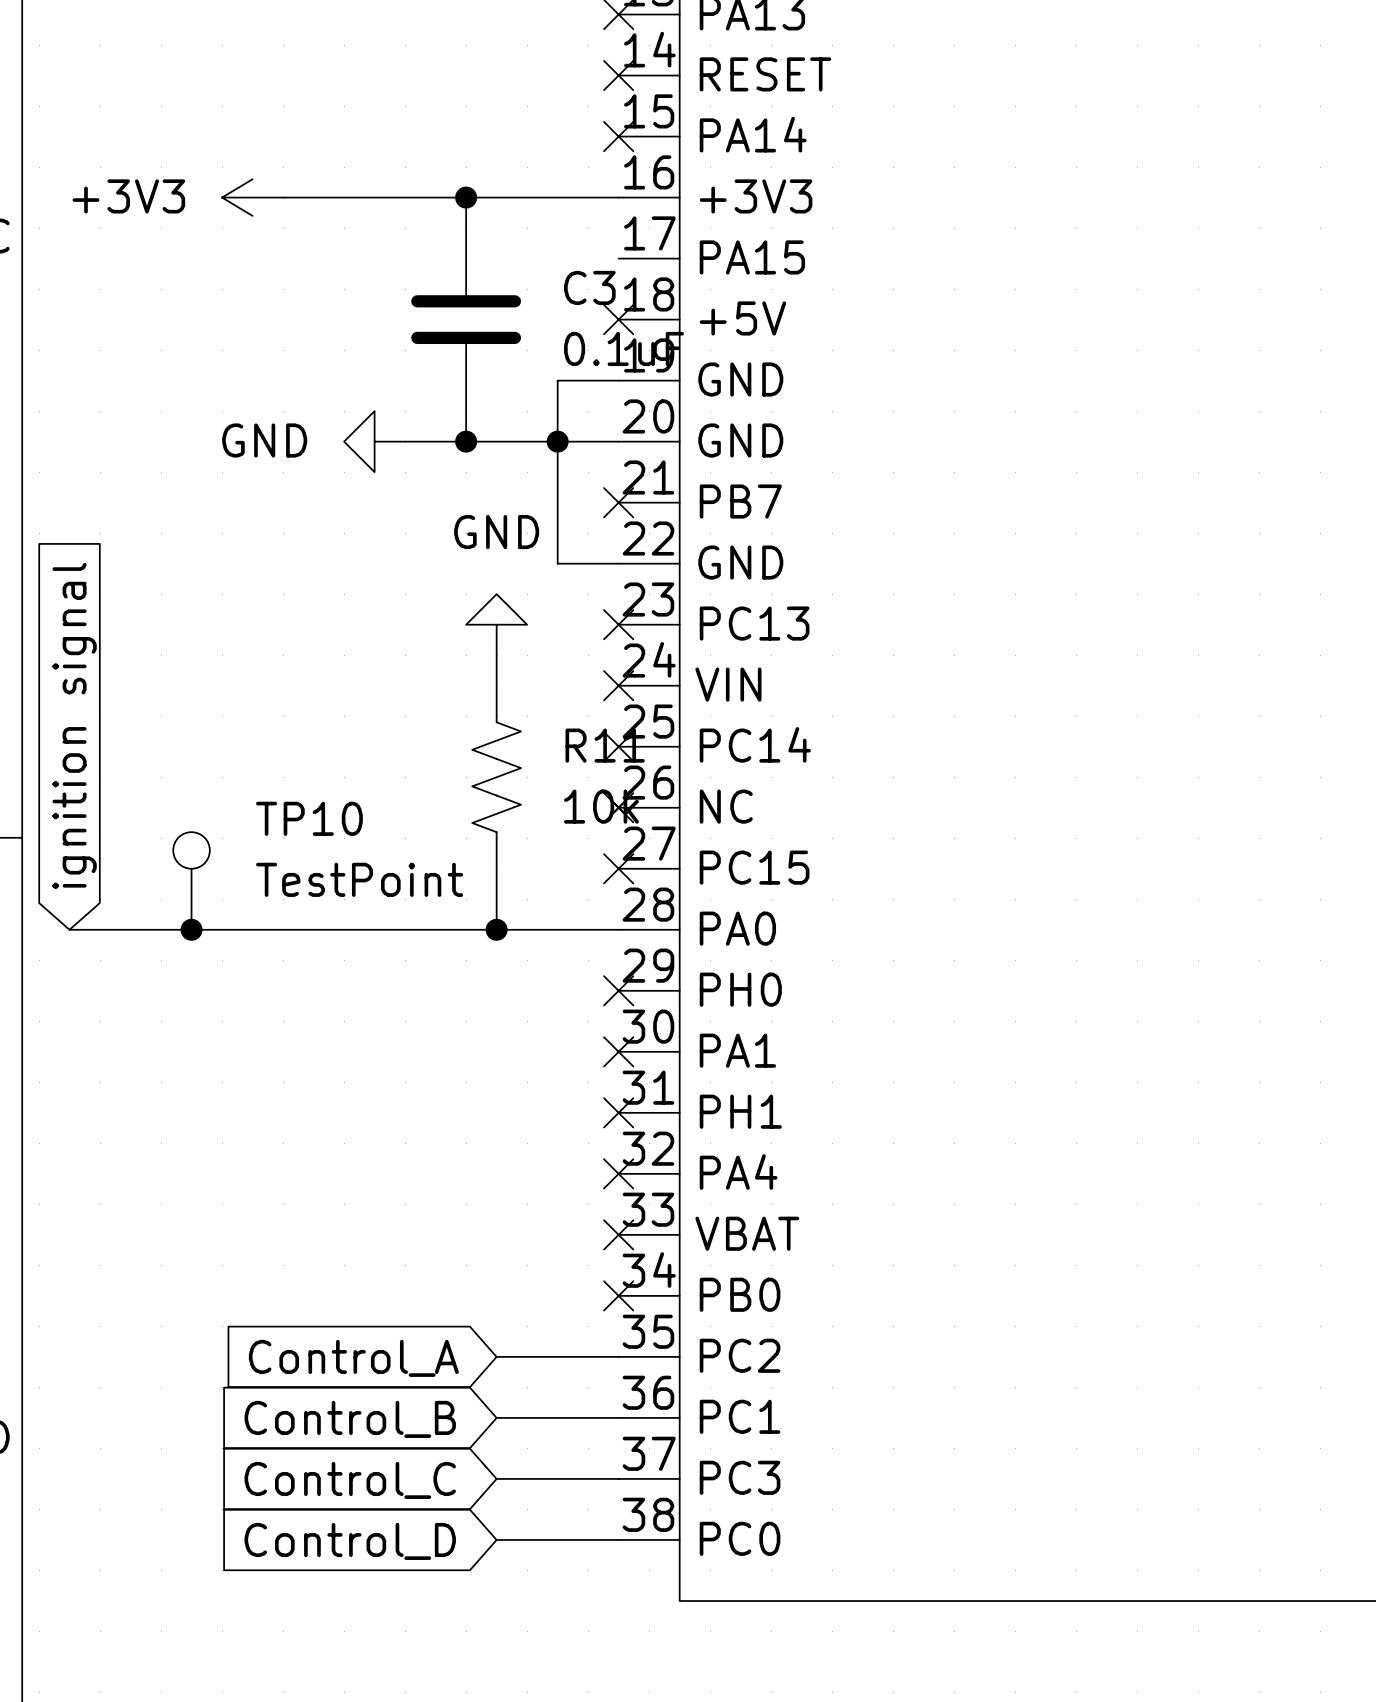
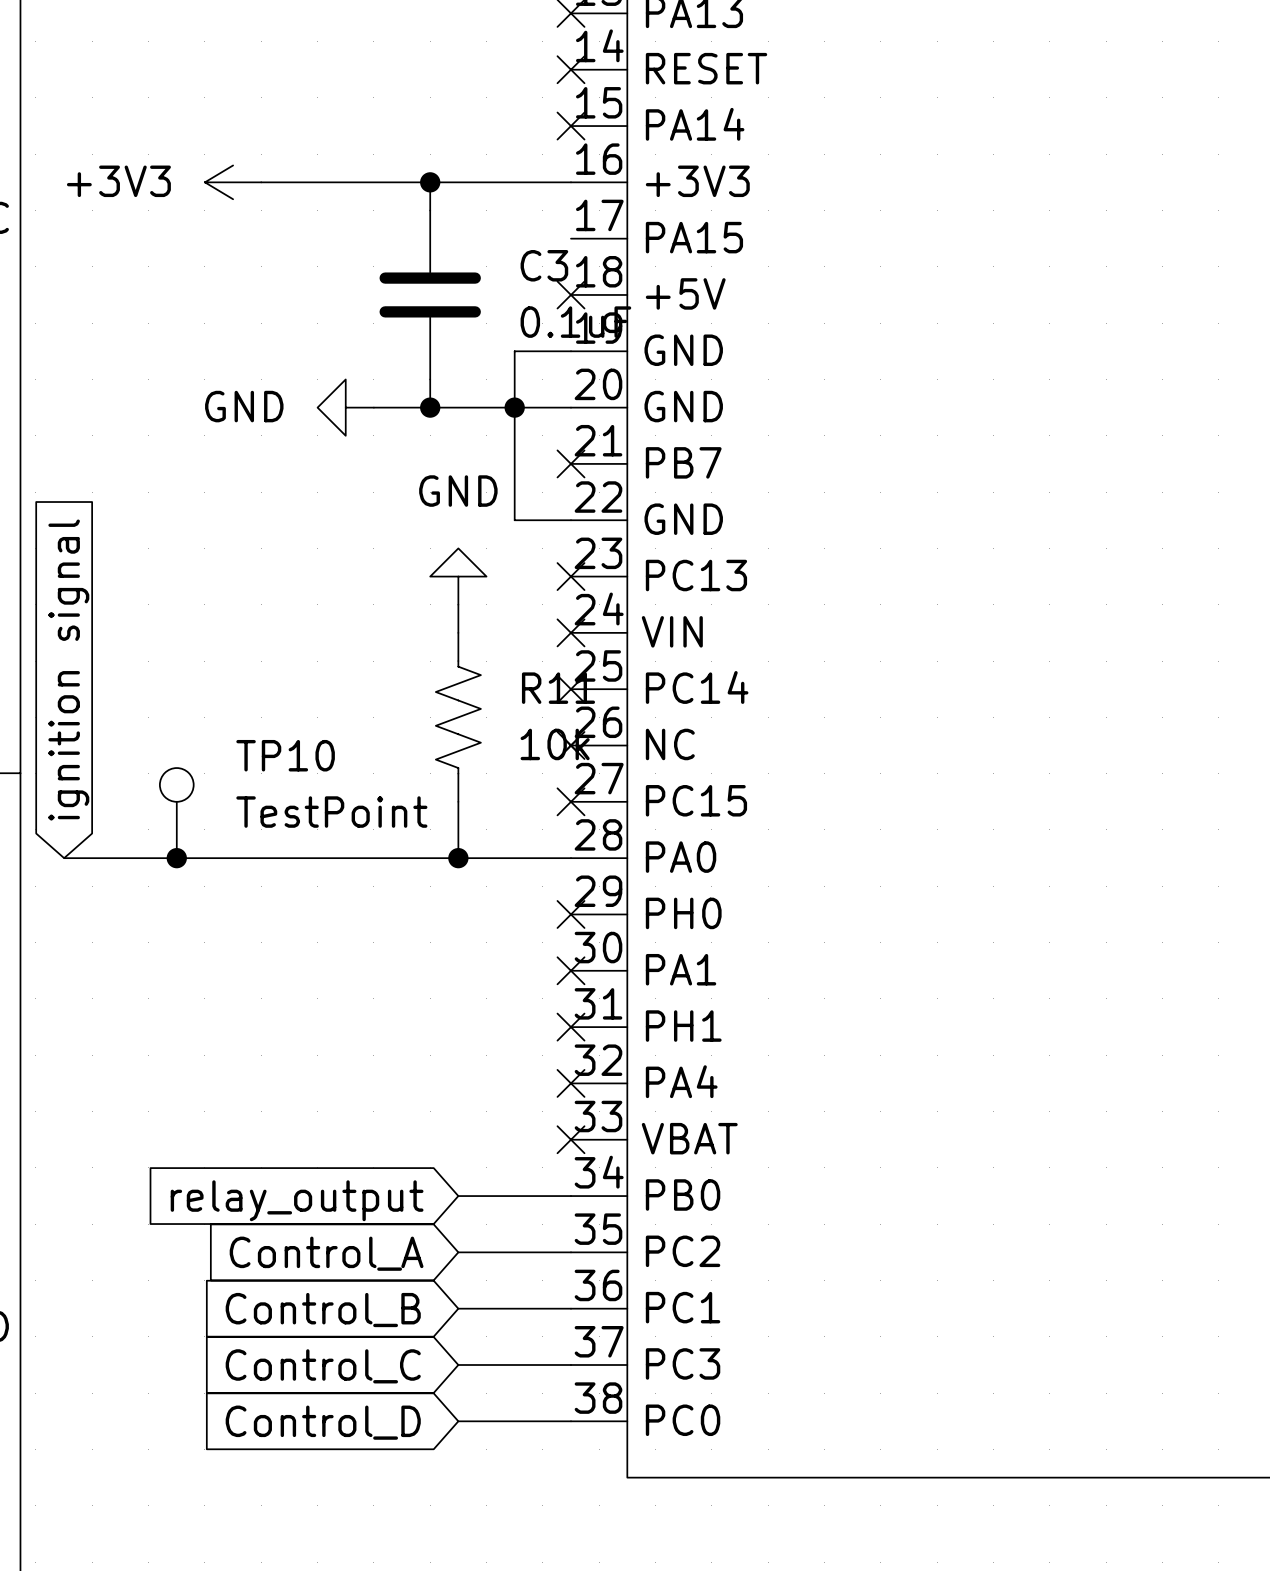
wire: none -> (458, 1196) (571, 1196)
no-connect mark: (618, 1295) -> none
global label: none -> relay_output (297, 1200)

